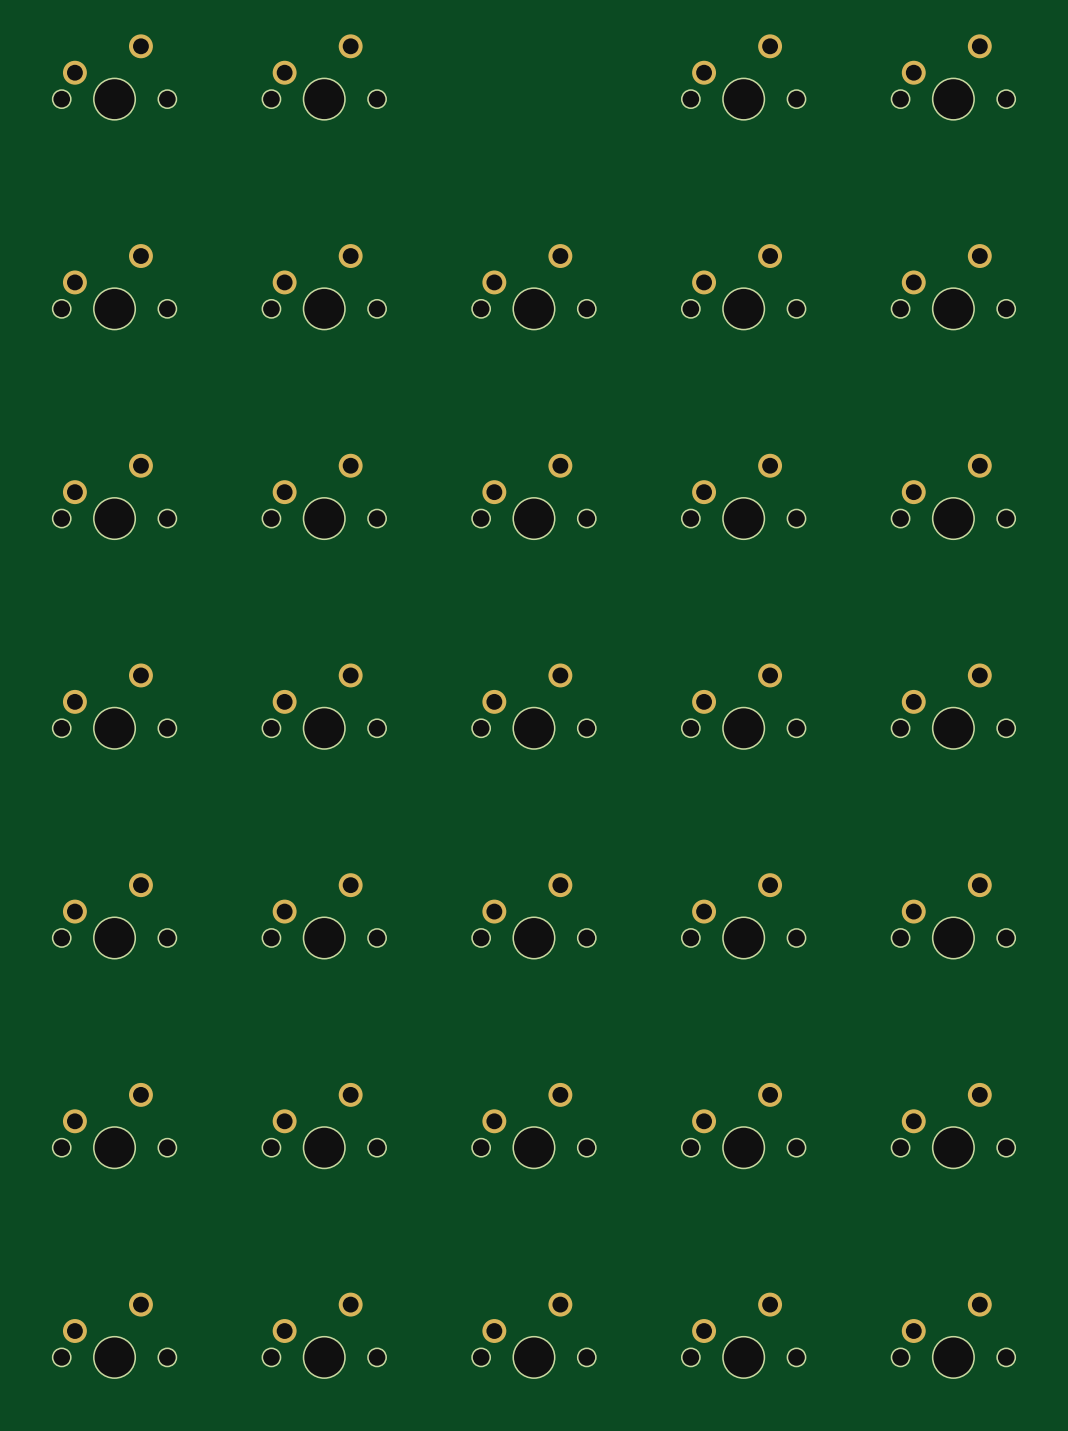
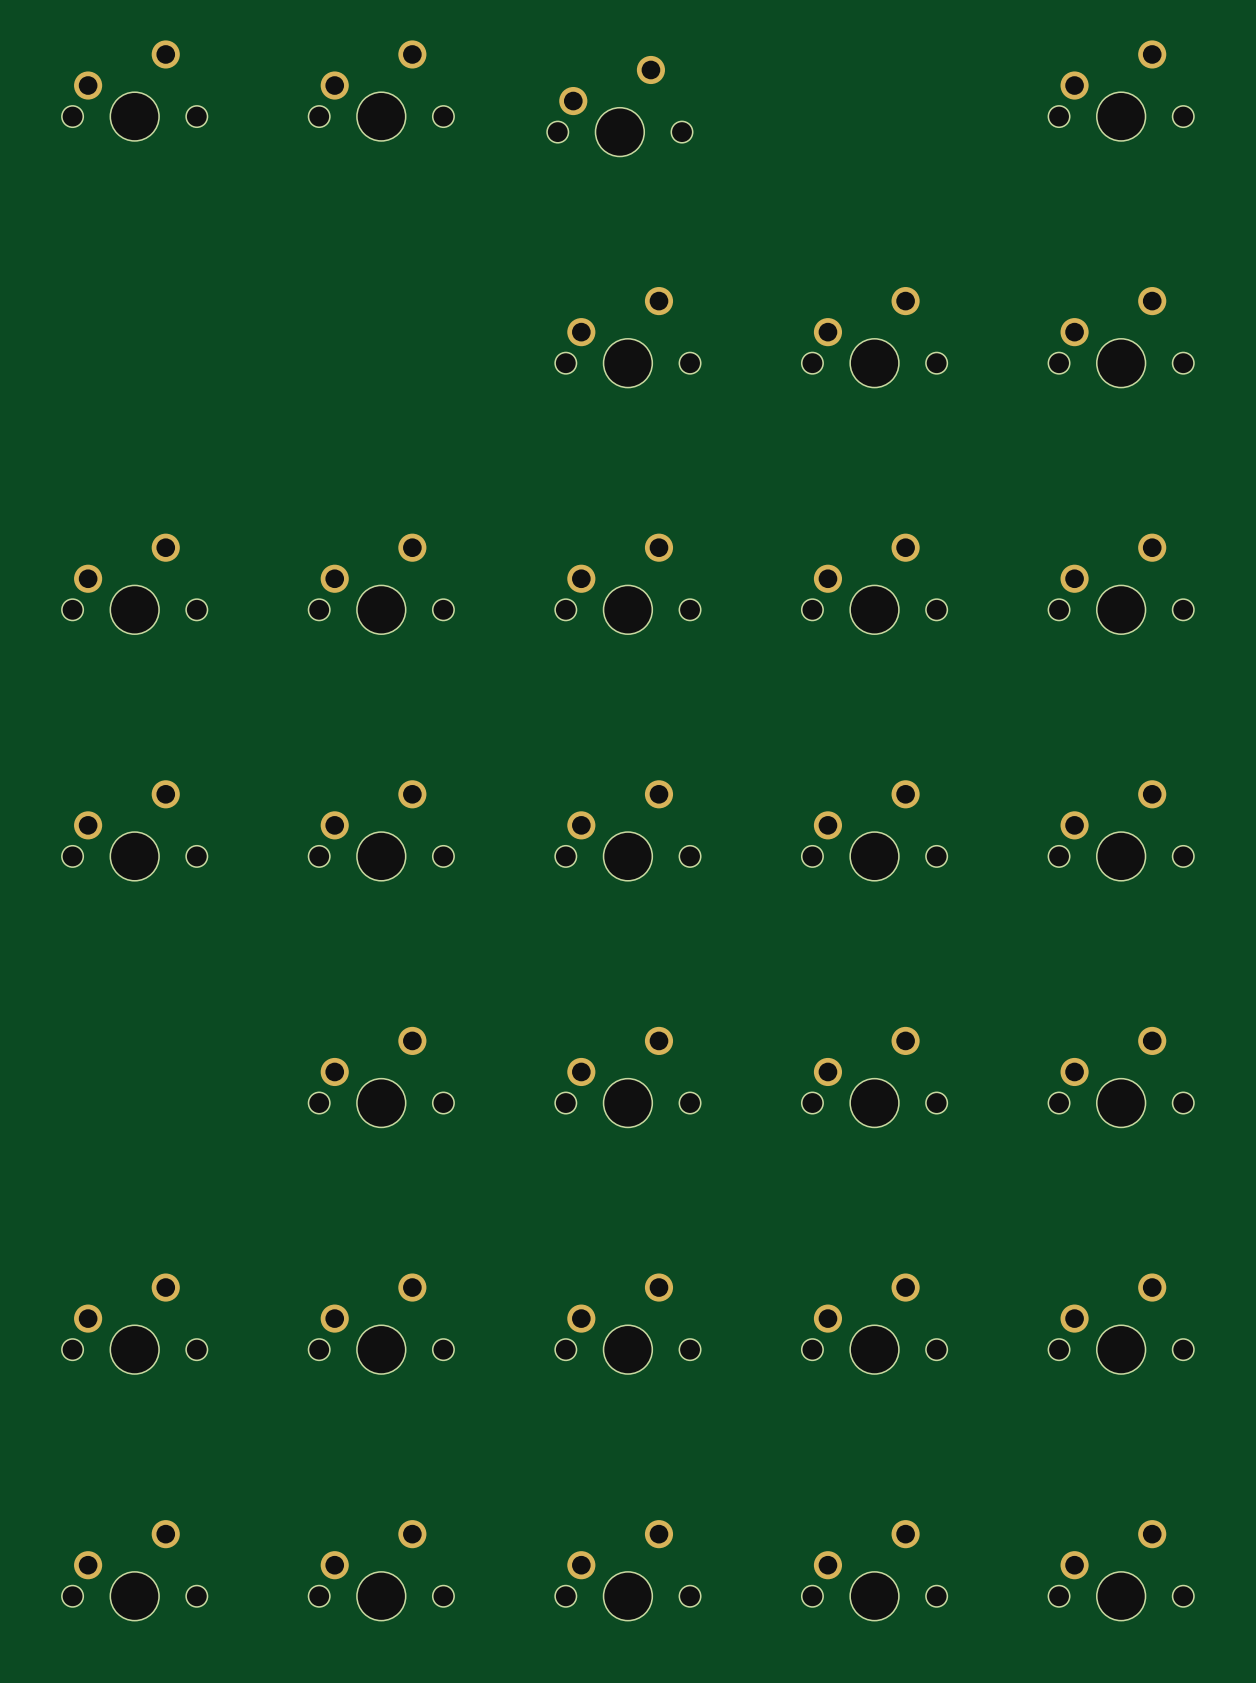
part: (743, 77) -> none
part: none -> (619, 106)
part: (114, 286) -> none
part: (324, 286) -> none
part: (114, 915) -> none

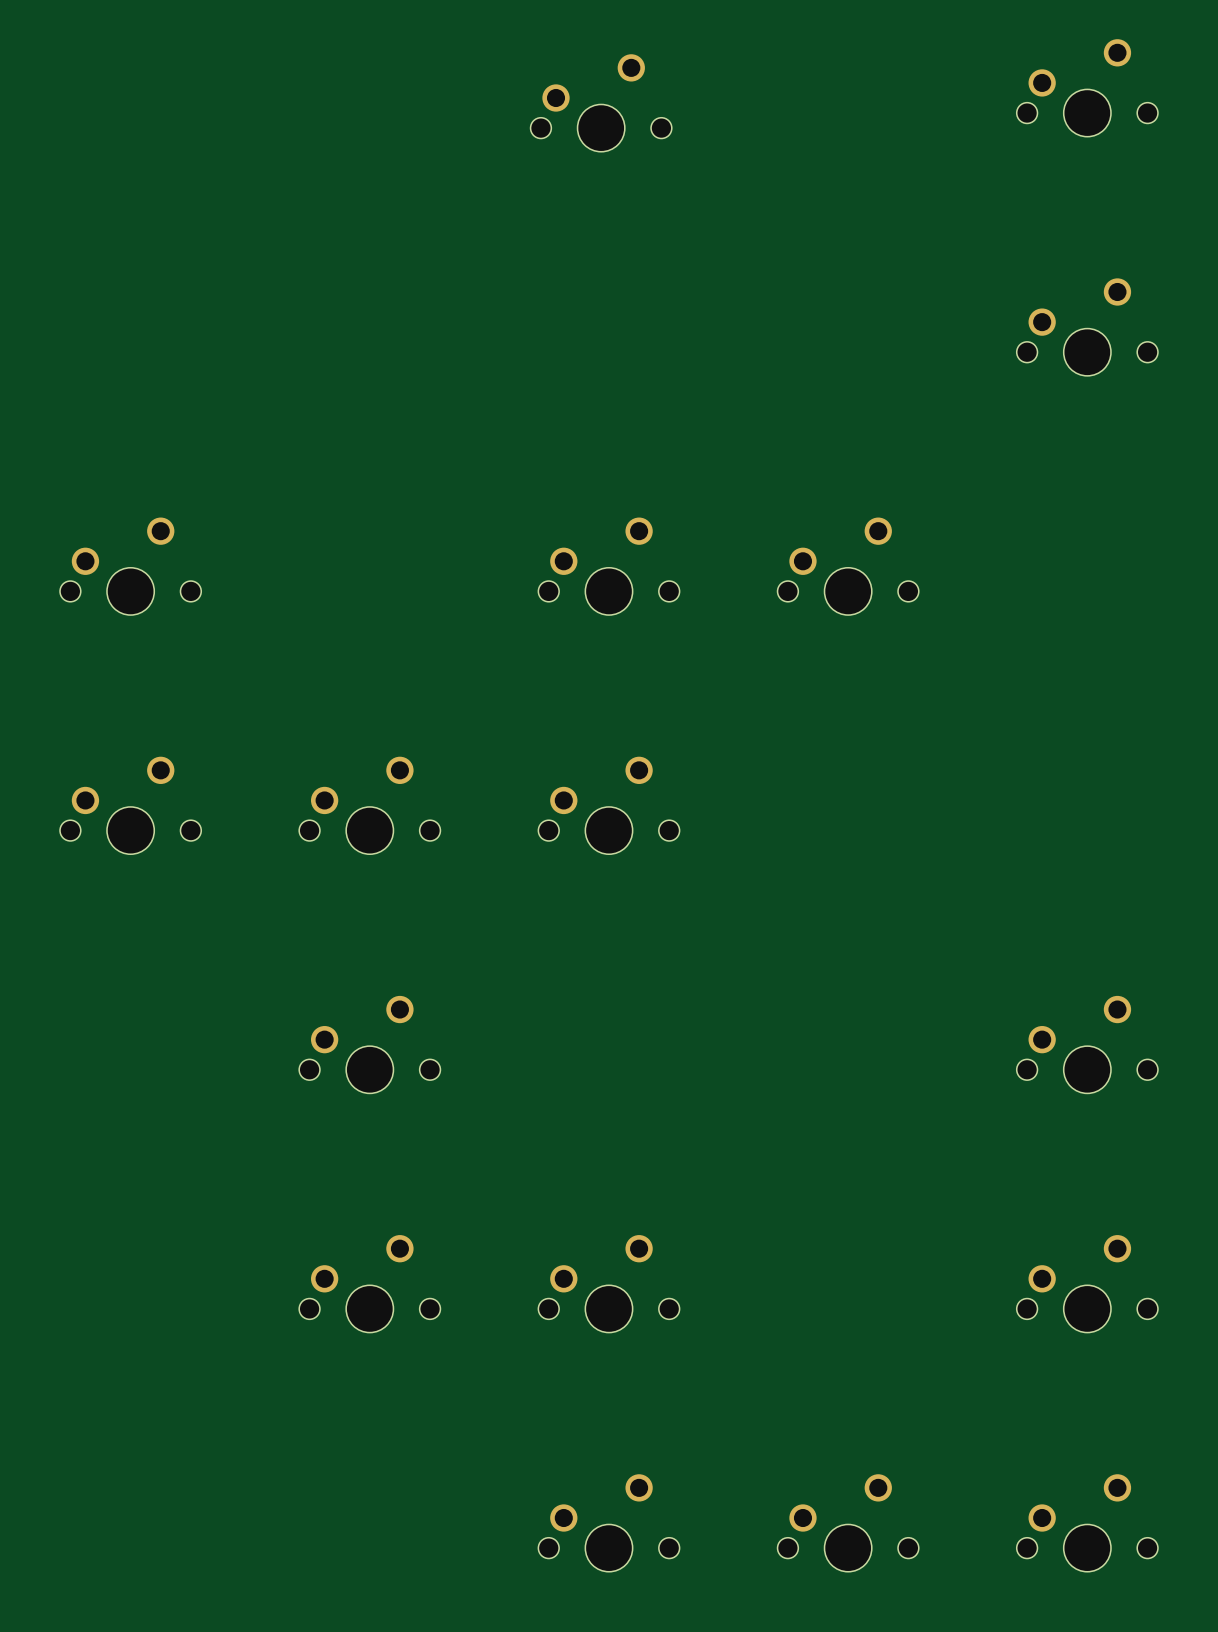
part: (134, 90) -> none
part: (381, 90) -> none
part: (627, 337) -> none
part: (874, 337) -> none
part: (381, 583) -> none
part: (1121, 583) -> none
part: (874, 830) -> none
part: (1121, 830) -> none
part: (627, 1077) -> none
part: (874, 1077) -> none
part: (134, 1323) -> none
part: (874, 1323) -> none
part: (134, 1570) -> none
part: (381, 1570) -> none

